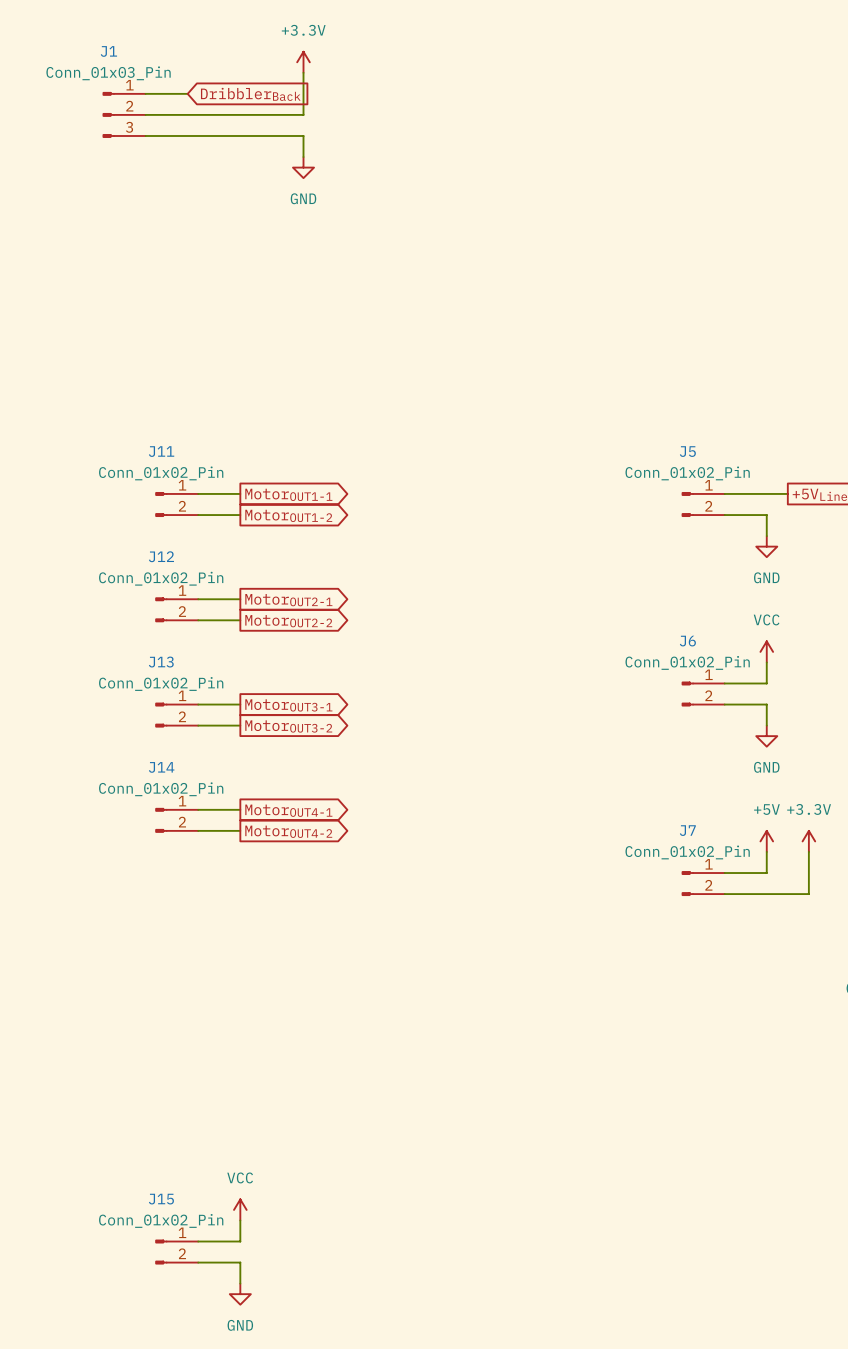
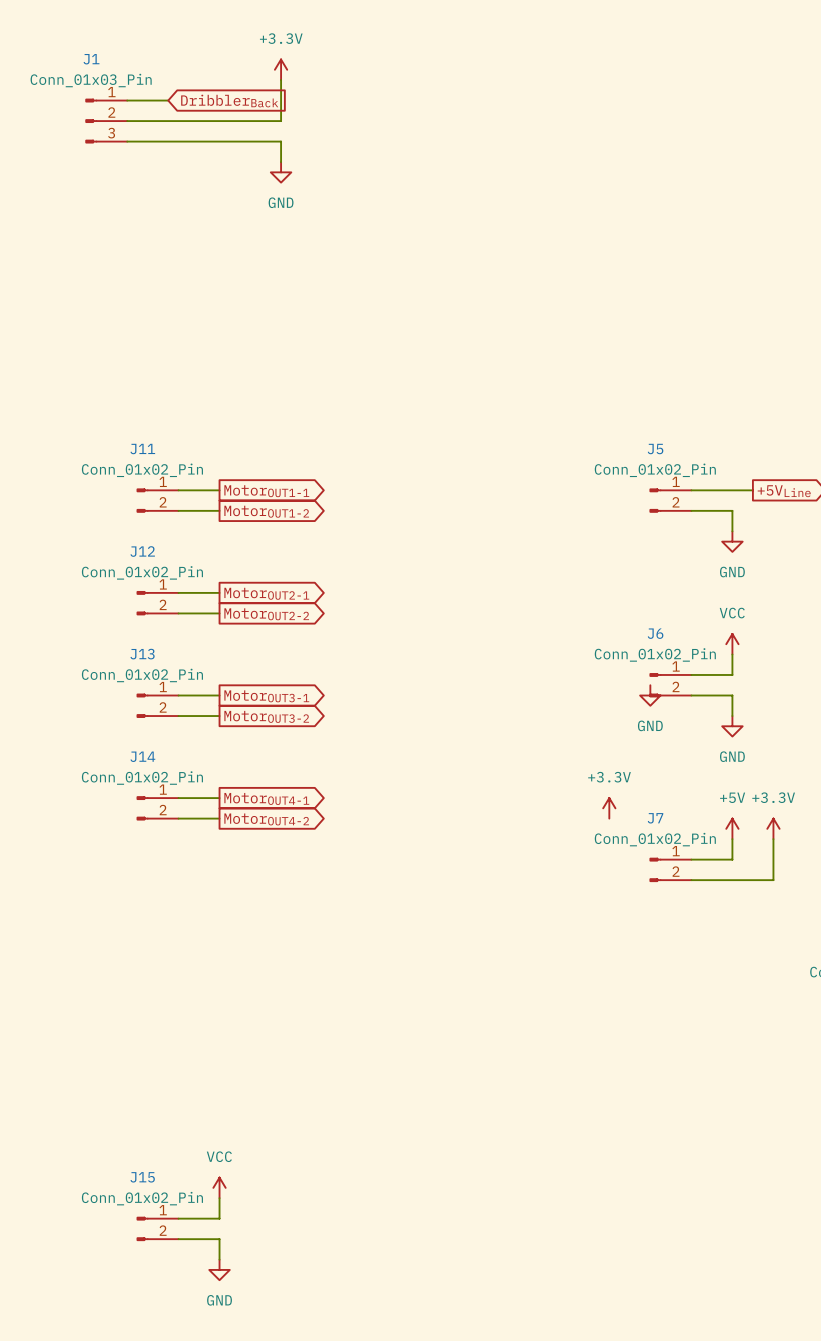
power symbol: none -> GND (650, 695)
power symbol: none -> +3.3V (609, 808)

